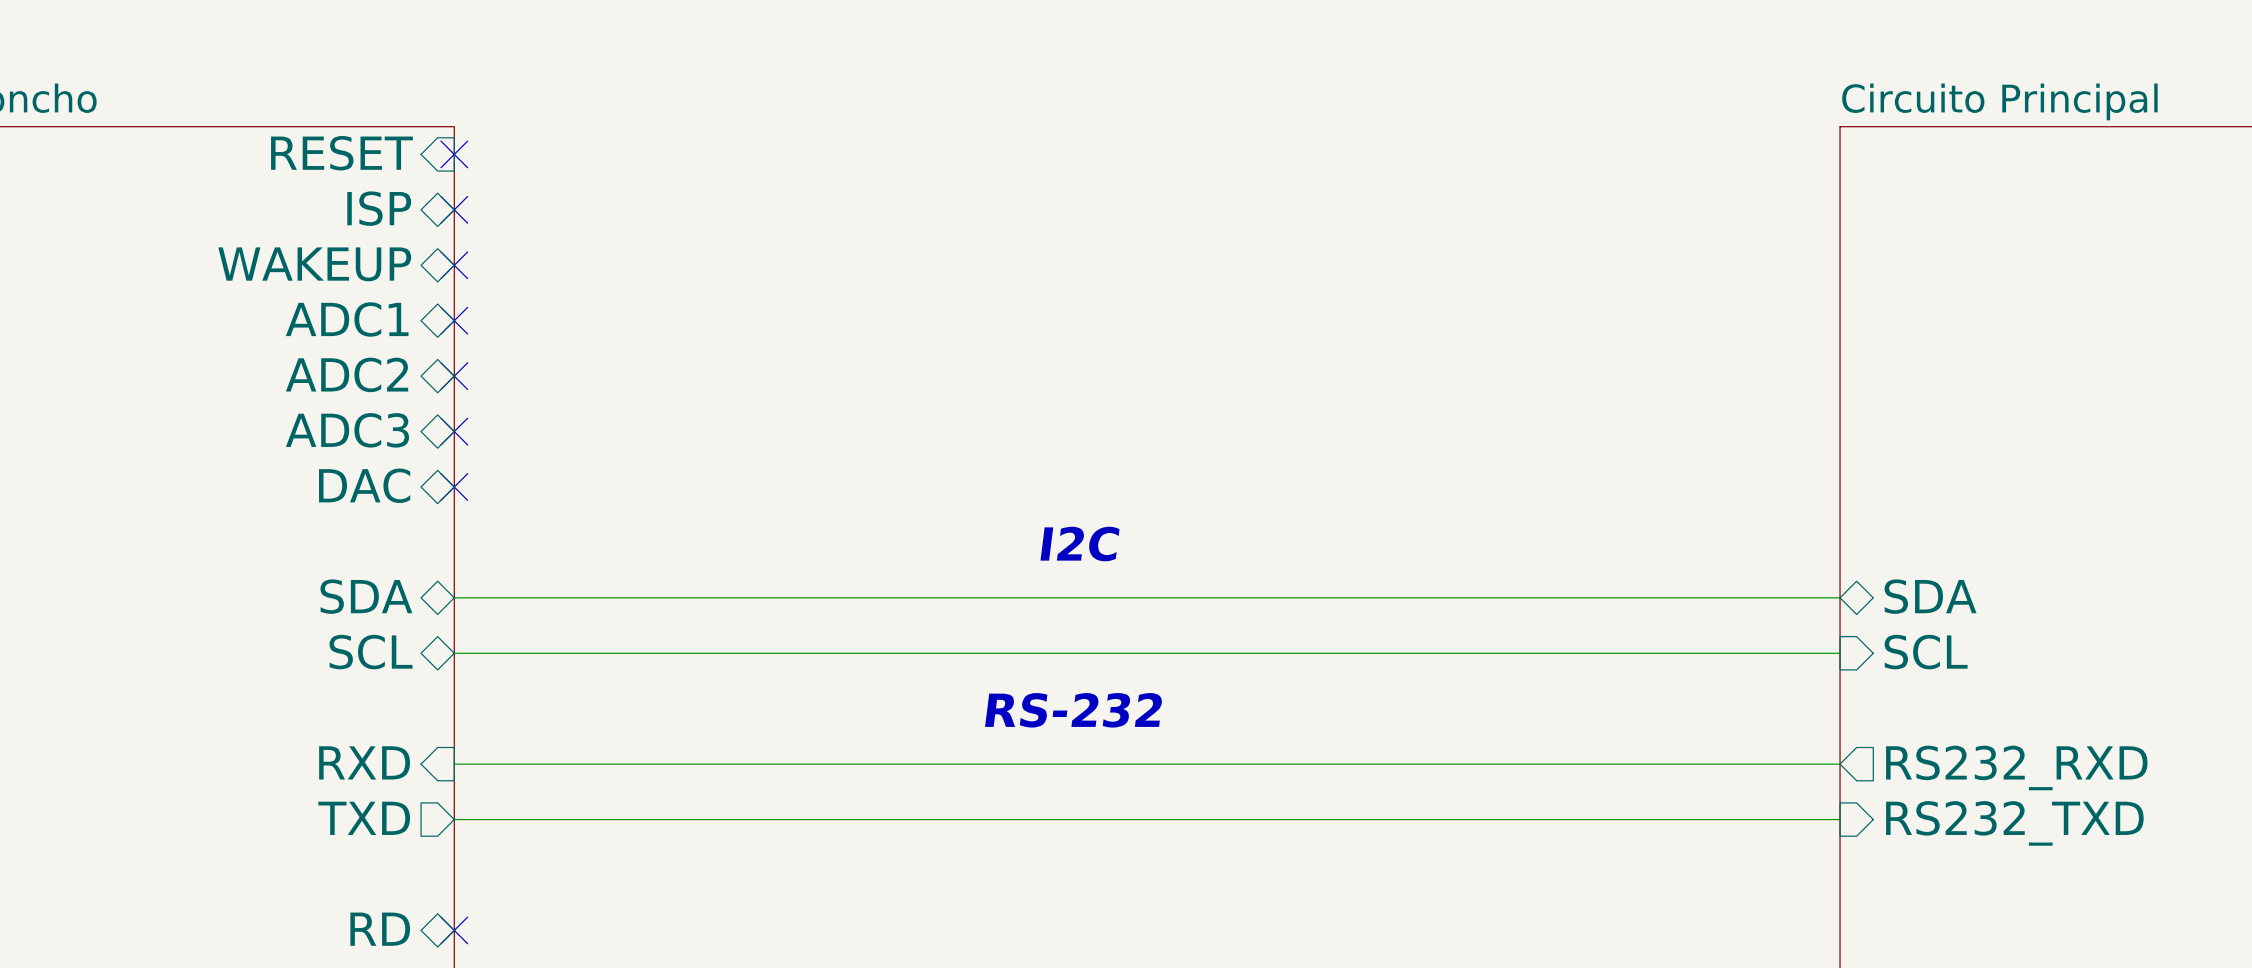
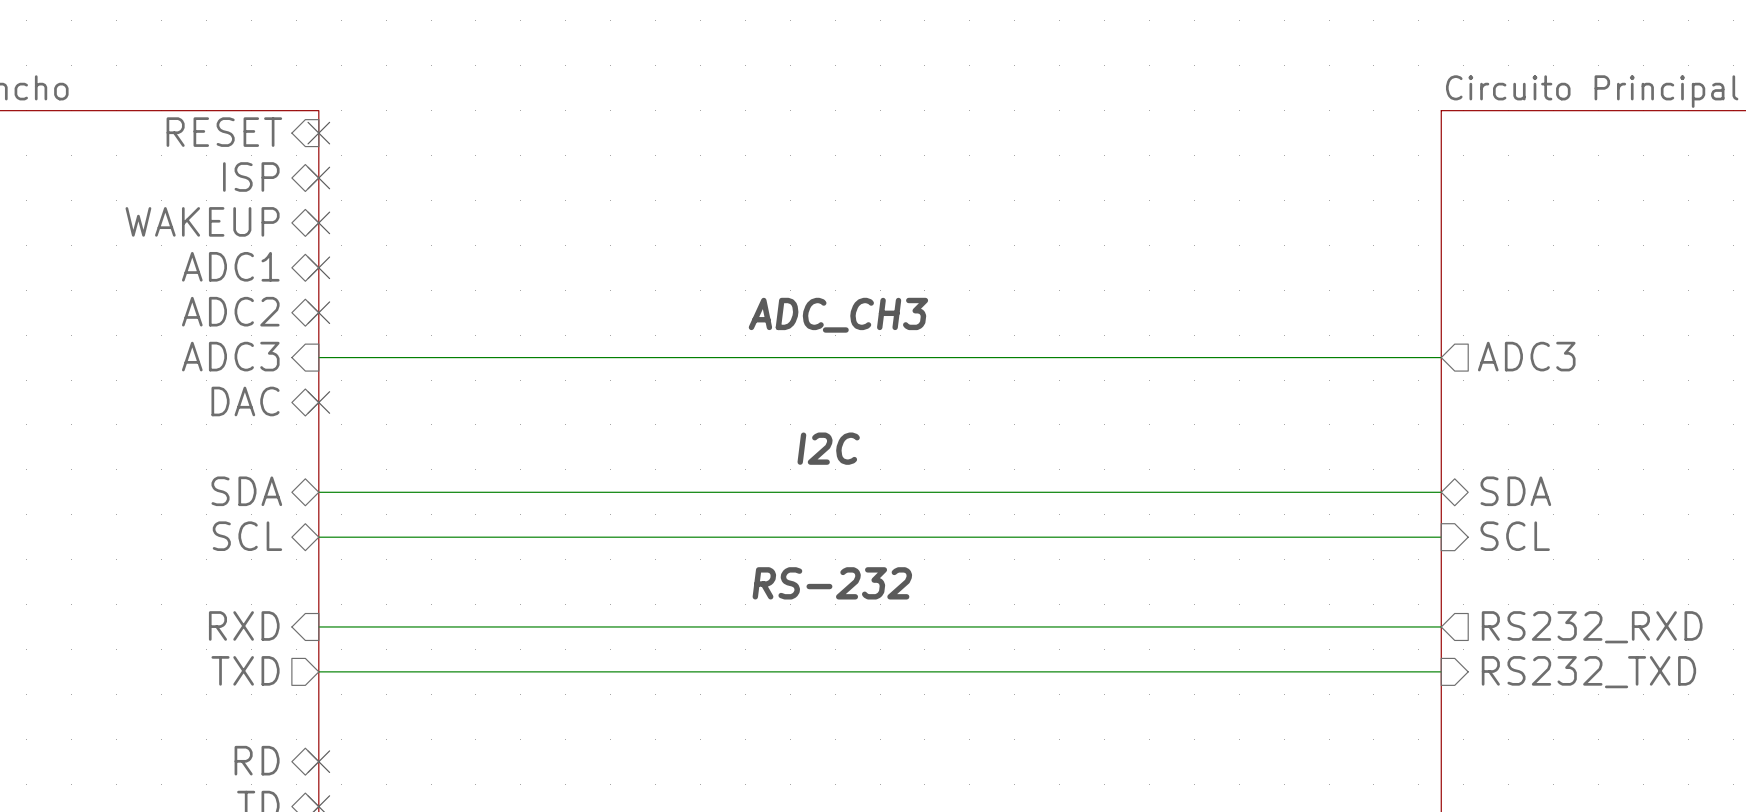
text: none -> ADC_CH3 (838, 315)
sheet pin shape: bidirectional (347, 430) -> input (230, 356)
sheet pin: none -> ADC3 (1526, 356)
wire: none -> (318, 357) (1441, 357)
no-connect mark: (454, 431) -> none

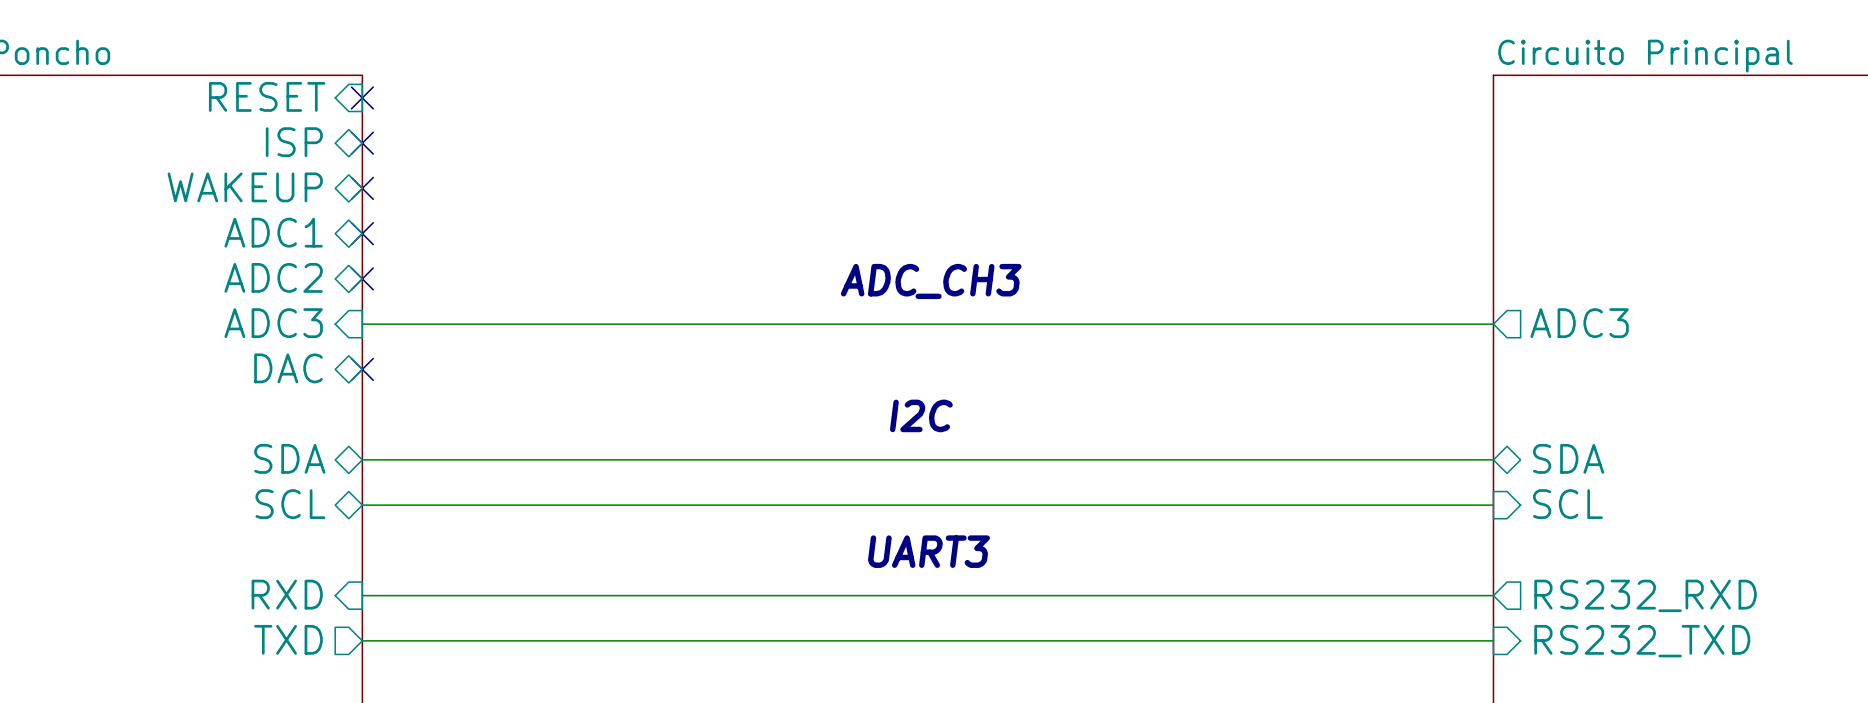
text position: ADC_CH3 (838, 315) -> ADC_CH3 (931, 281)
text position: I2C (828, 448) -> I2C (921, 415)
text: RS-232 (832, 583) -> none
text: none -> UART3 (928, 551)

